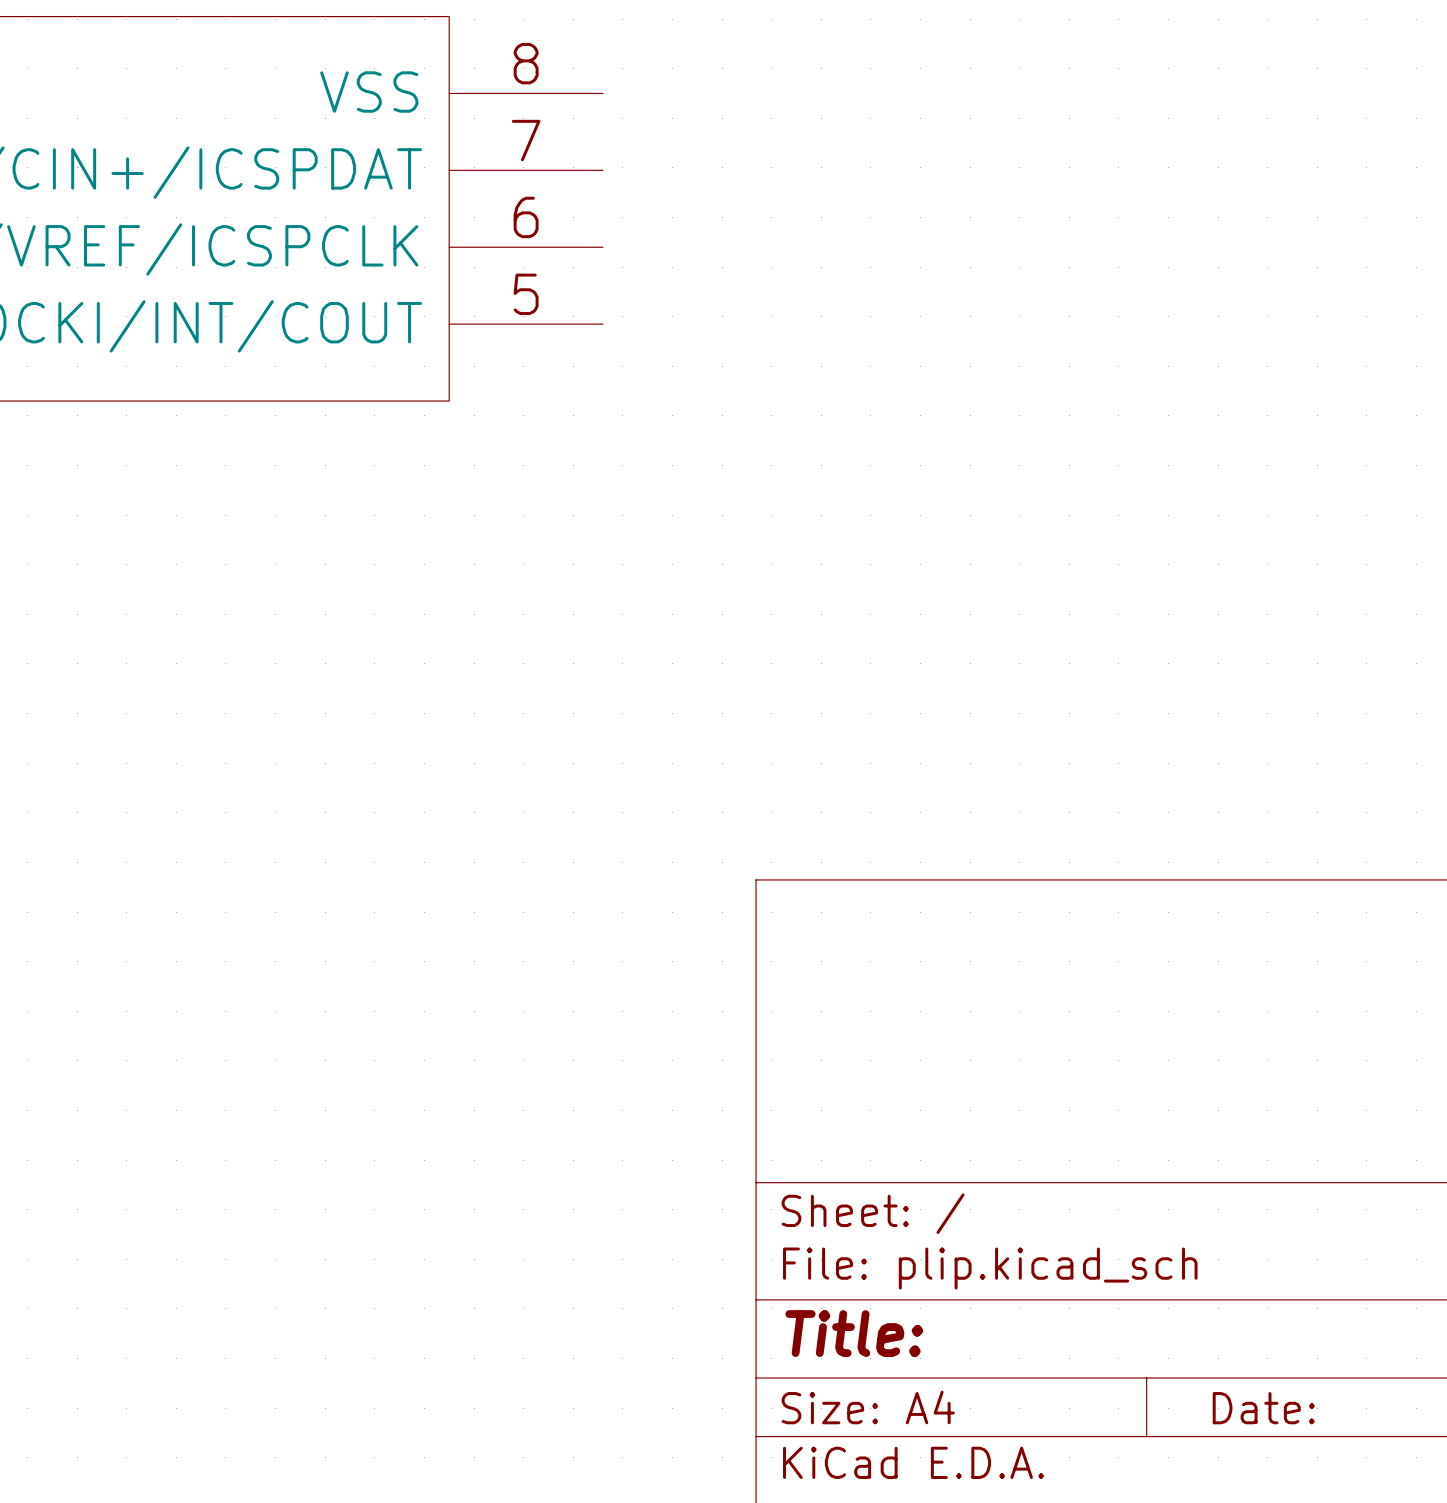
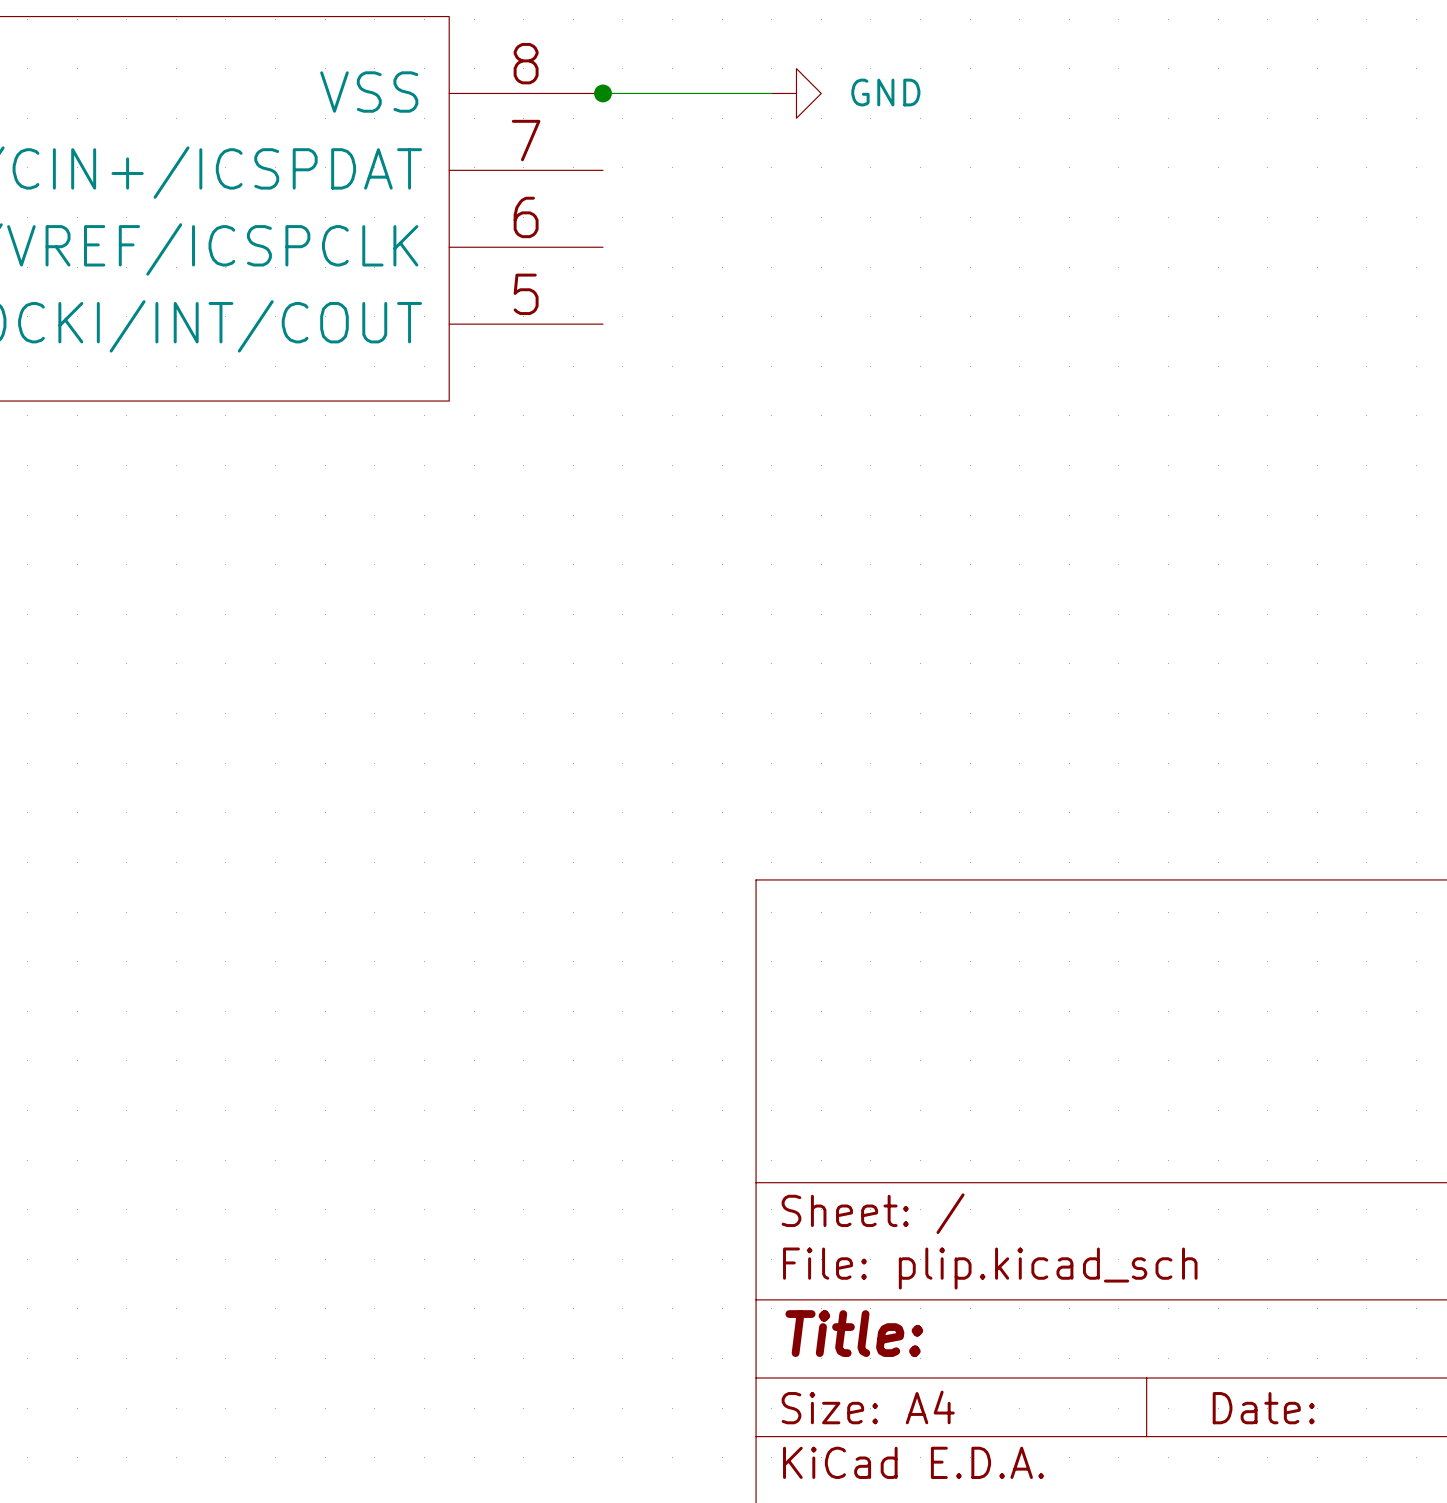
wire: none -> (598, 93) (771, 93)
junction: none -> (603, 93)
power symbol: none -> GND (796, 93)

